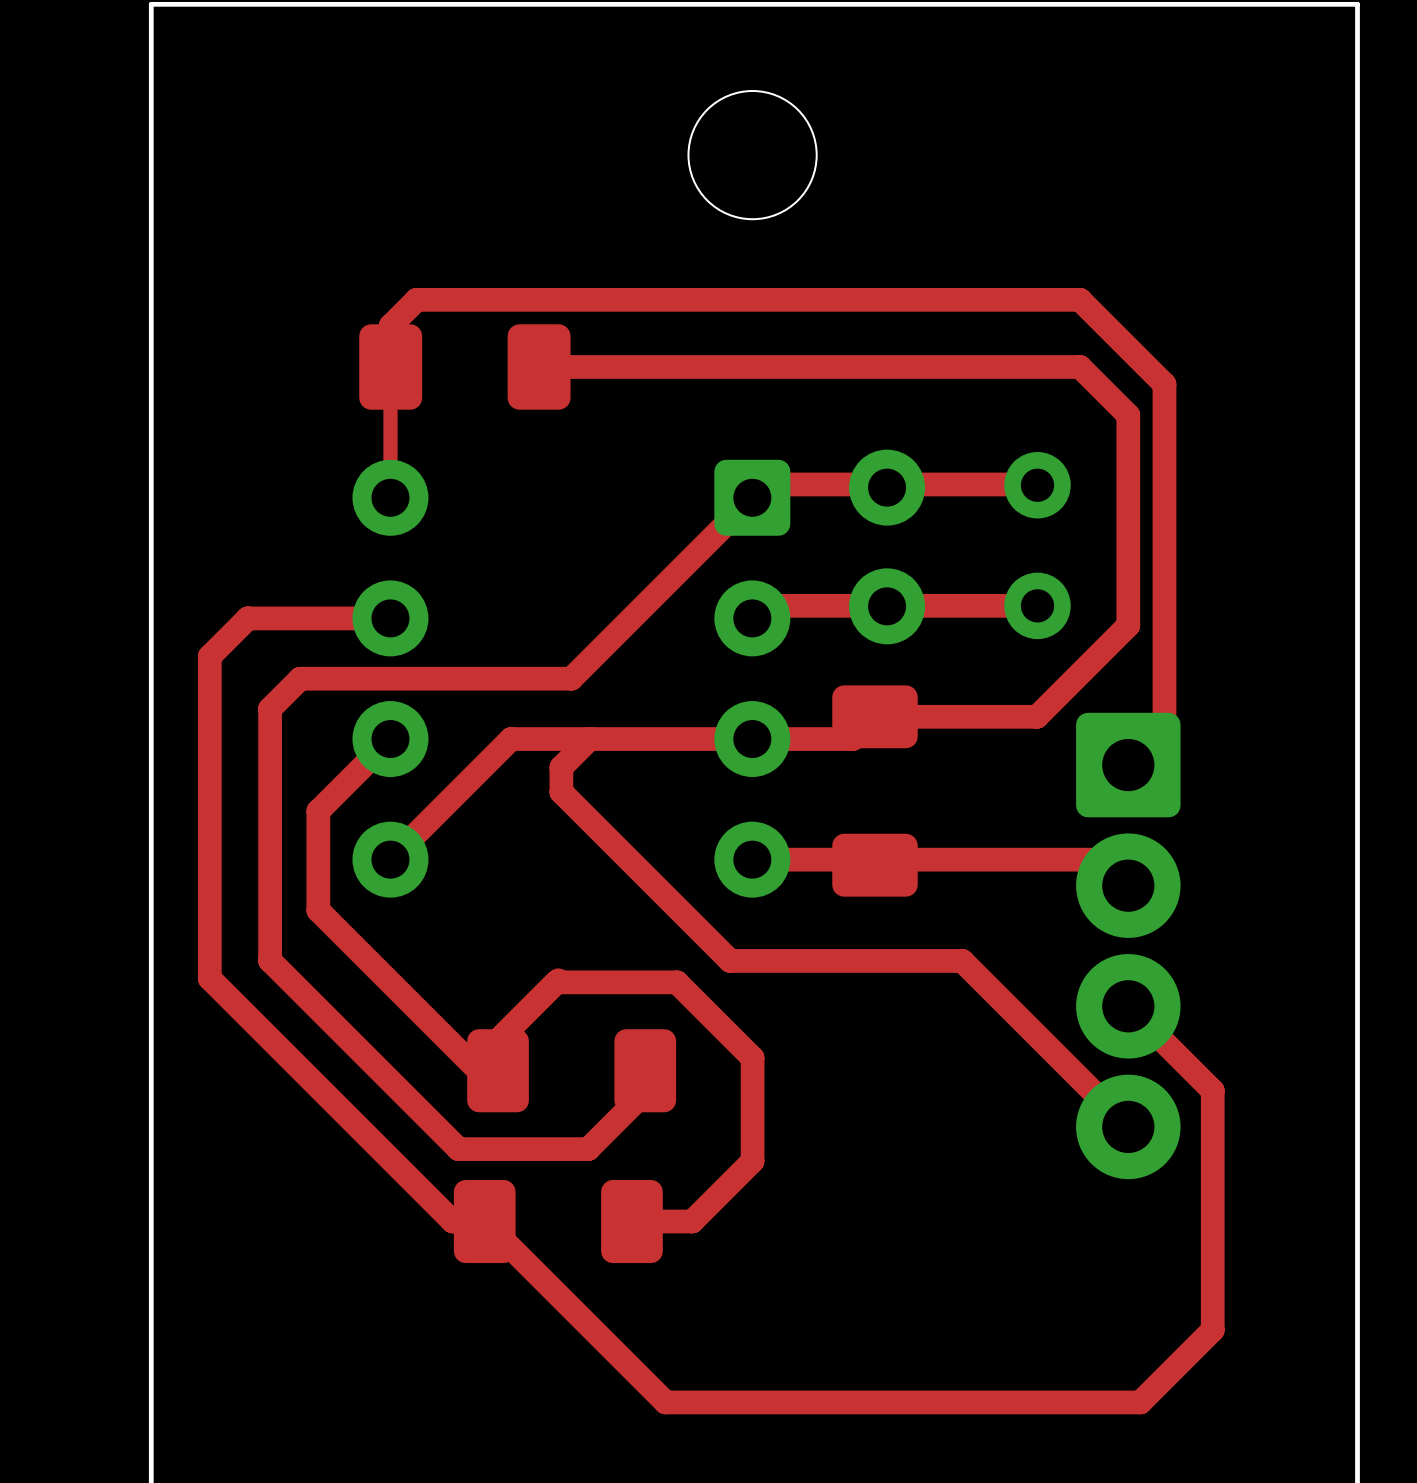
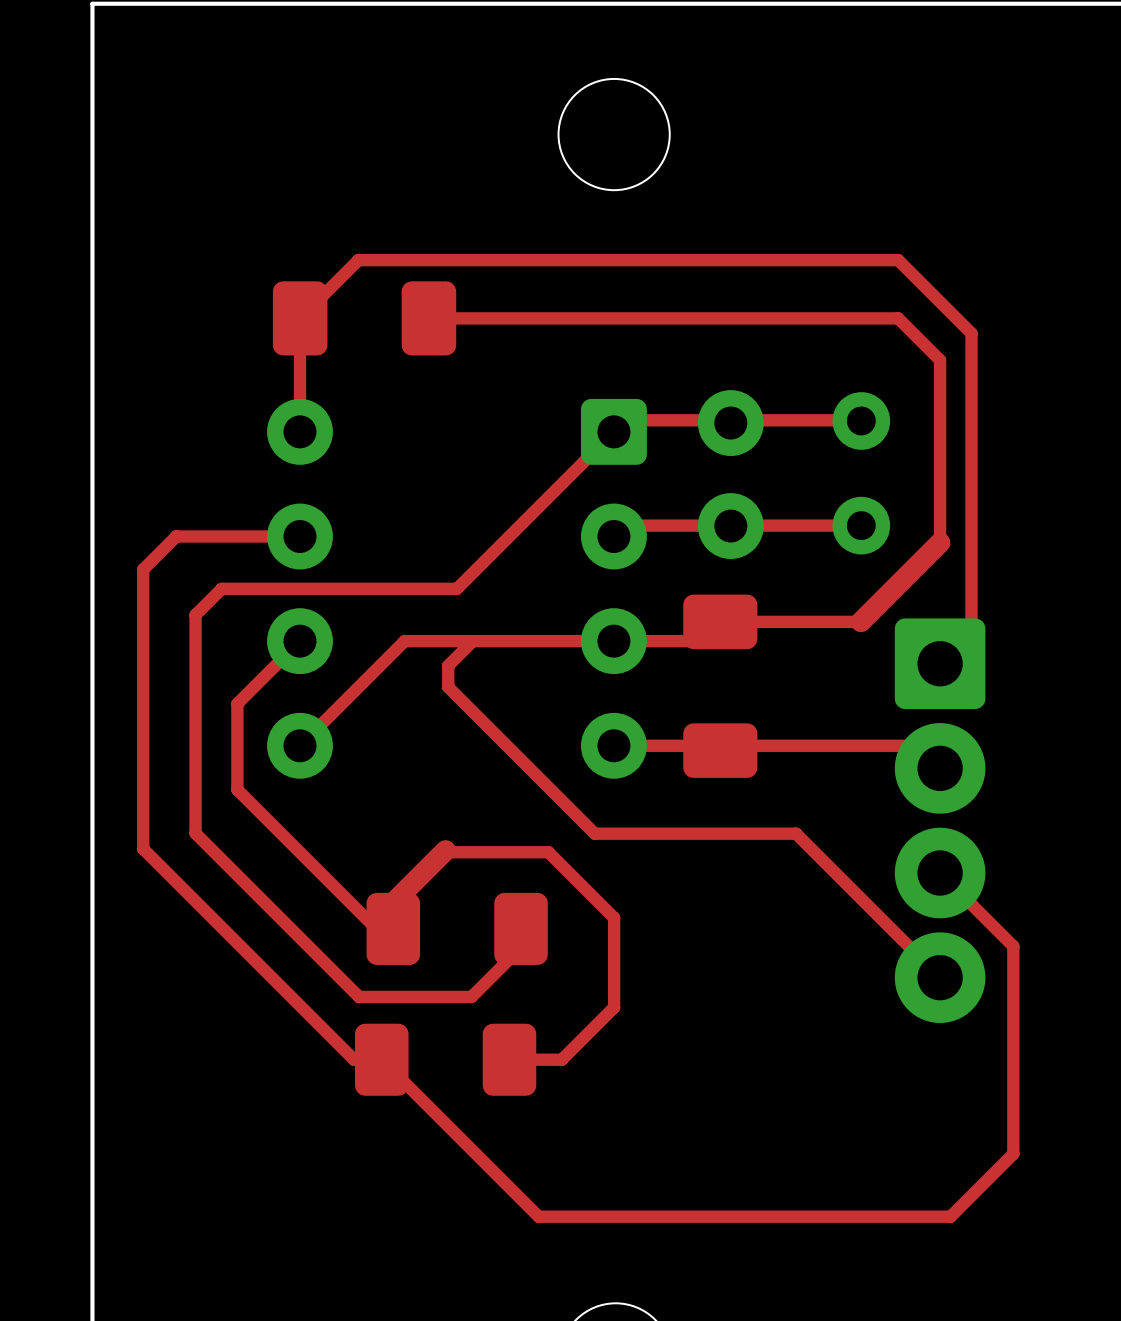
top track: (457, 299) (416, 299) (390, 325) (390, 367) -> (358, 260) (300, 318)
top track width: thick (457, 299) (1080, 299) (1164, 384) (1164, 728) (1128, 765) -> thin (358, 260) (898, 260) (971, 333) (971, 632) (940, 663)
top track width: thick (539, 367) (1080, 367) (1128, 415) (1128, 625) -> thin (428, 318) (898, 318) (940, 360) (940, 542)
top track width: thick (1054, 484) (765, 484) (571, 678) (300, 678) (270, 708) (270, 960) (458, 1149) (588, 1149) (645, 1092) (645, 1070) -> thin (875, 420) (625, 420) (456, 588) (221, 588) (195, 614) (195, 833) (359, 996) (471, 996) (521, 947) (521, 928)
top track width: thick (1037, 605) (764, 605) (752, 618) (765, 631) -> thin (861, 525) (624, 525) (613, 536) (625, 548)
top track width: thick (247, 618) (209, 656) (209, 978) (452, 1221) (484, 1221) (665, 1402) (1140, 1402) (1212, 1330) (1212, 1090) (1128, 1006) -> thin (176, 536) (143, 569) (143, 848) (354, 1059) (381, 1059) (538, 1216) (950, 1216) (1013, 1153) (1013, 946) (940, 873)
top track width: thick (390, 618) (247, 618) -> thin (299, 536) (176, 536)
top track width: thick (1037, 716) (875, 716) (852, 739) (511, 739) (390, 859) -> thin (860, 621) (720, 621) (701, 641) (404, 641) (299, 745)
top track width: thick (390, 739) (318, 811) (318, 910) (478, 1070) (498, 1070) -> thin (299, 641) (237, 703) (237, 789) (376, 928) (393, 928)
top track width: thick (589, 739) (561, 767) (561, 792) (730, 960) (962, 960) (1128, 1126) -> thin (472, 641) (448, 665) (448, 687) (594, 833) (796, 833) (940, 977)
top track width: thick (1102, 859) (752, 859) -> thin (917, 745) (613, 745)
top track width: thick (556, 982) (676, 982) (752, 1057) (752, 1161) (692, 1221) (631, 1221) -> thin (443, 852) (548, 852) (614, 917) (614, 1007) (561, 1059) (509, 1059)

